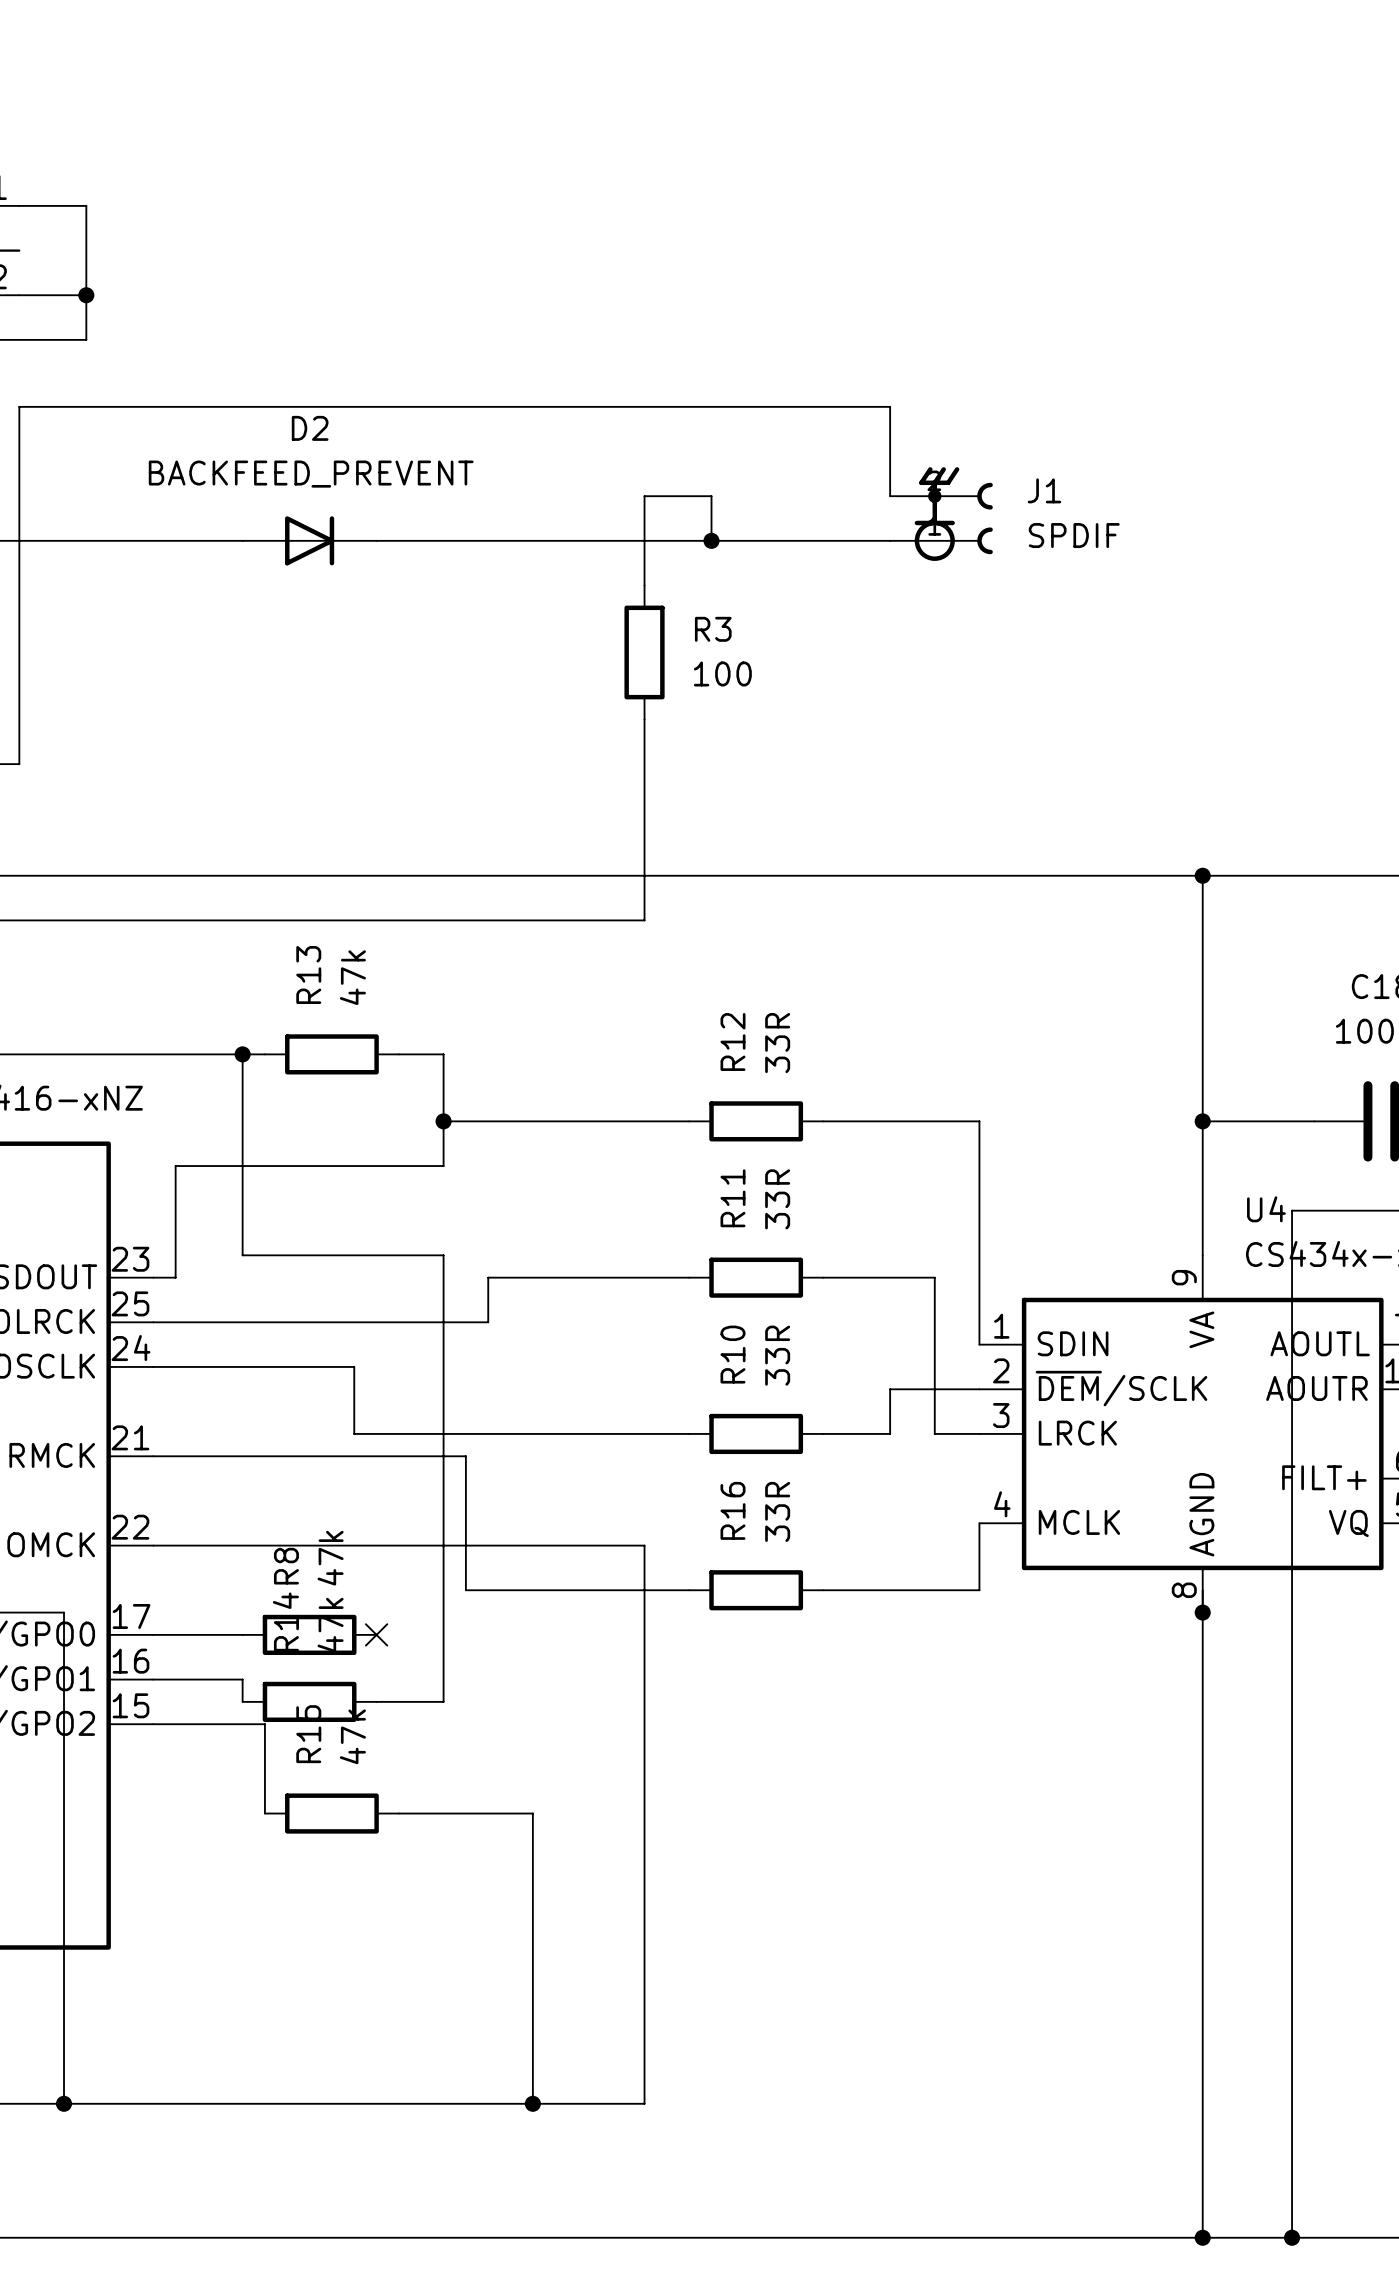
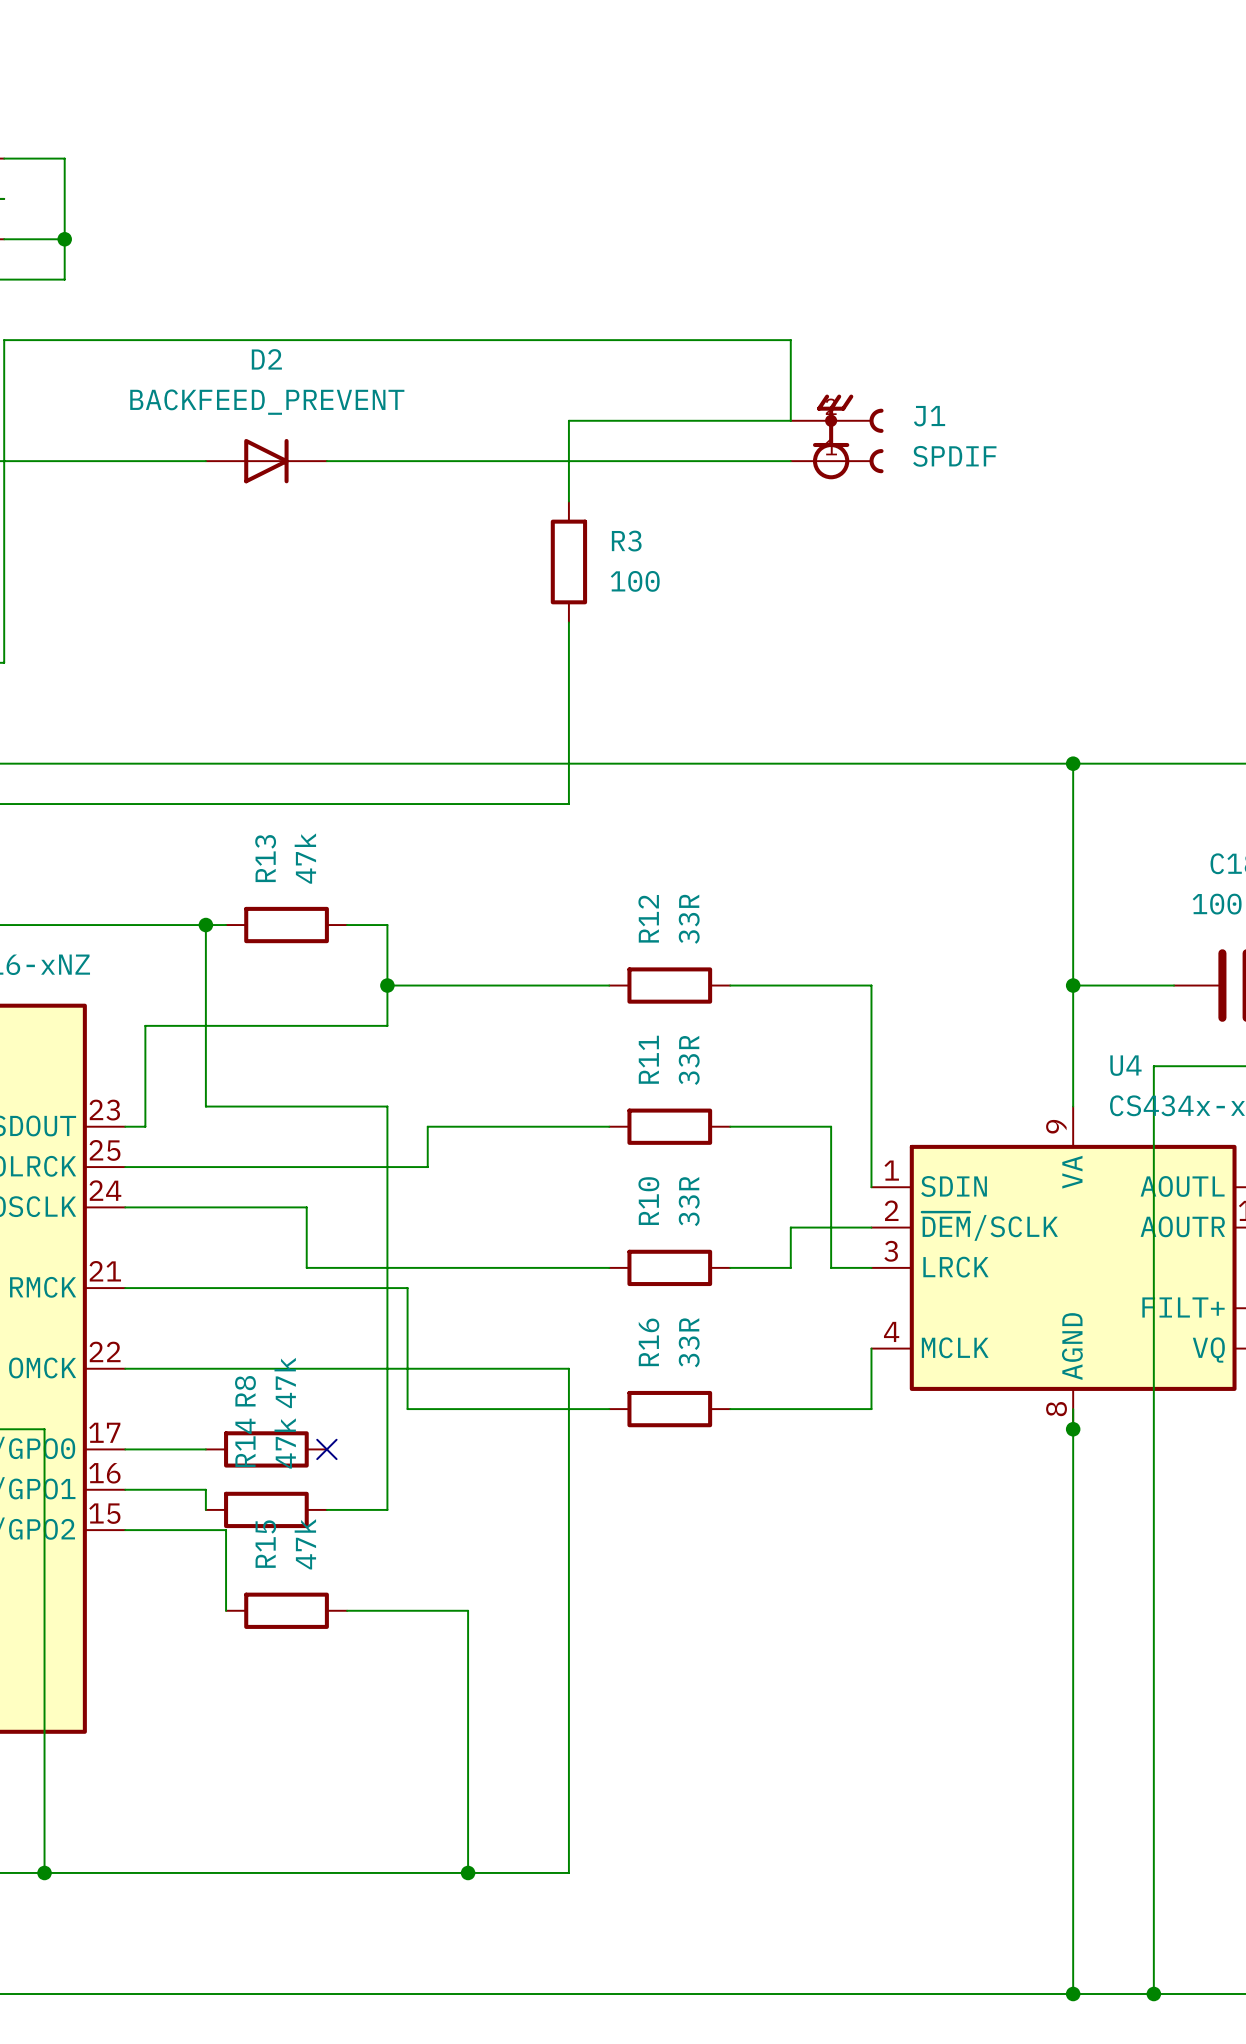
wire: (711, 496) (711, 540) -> (629, 420) (790, 420)
junction: (711, 540) -> none

